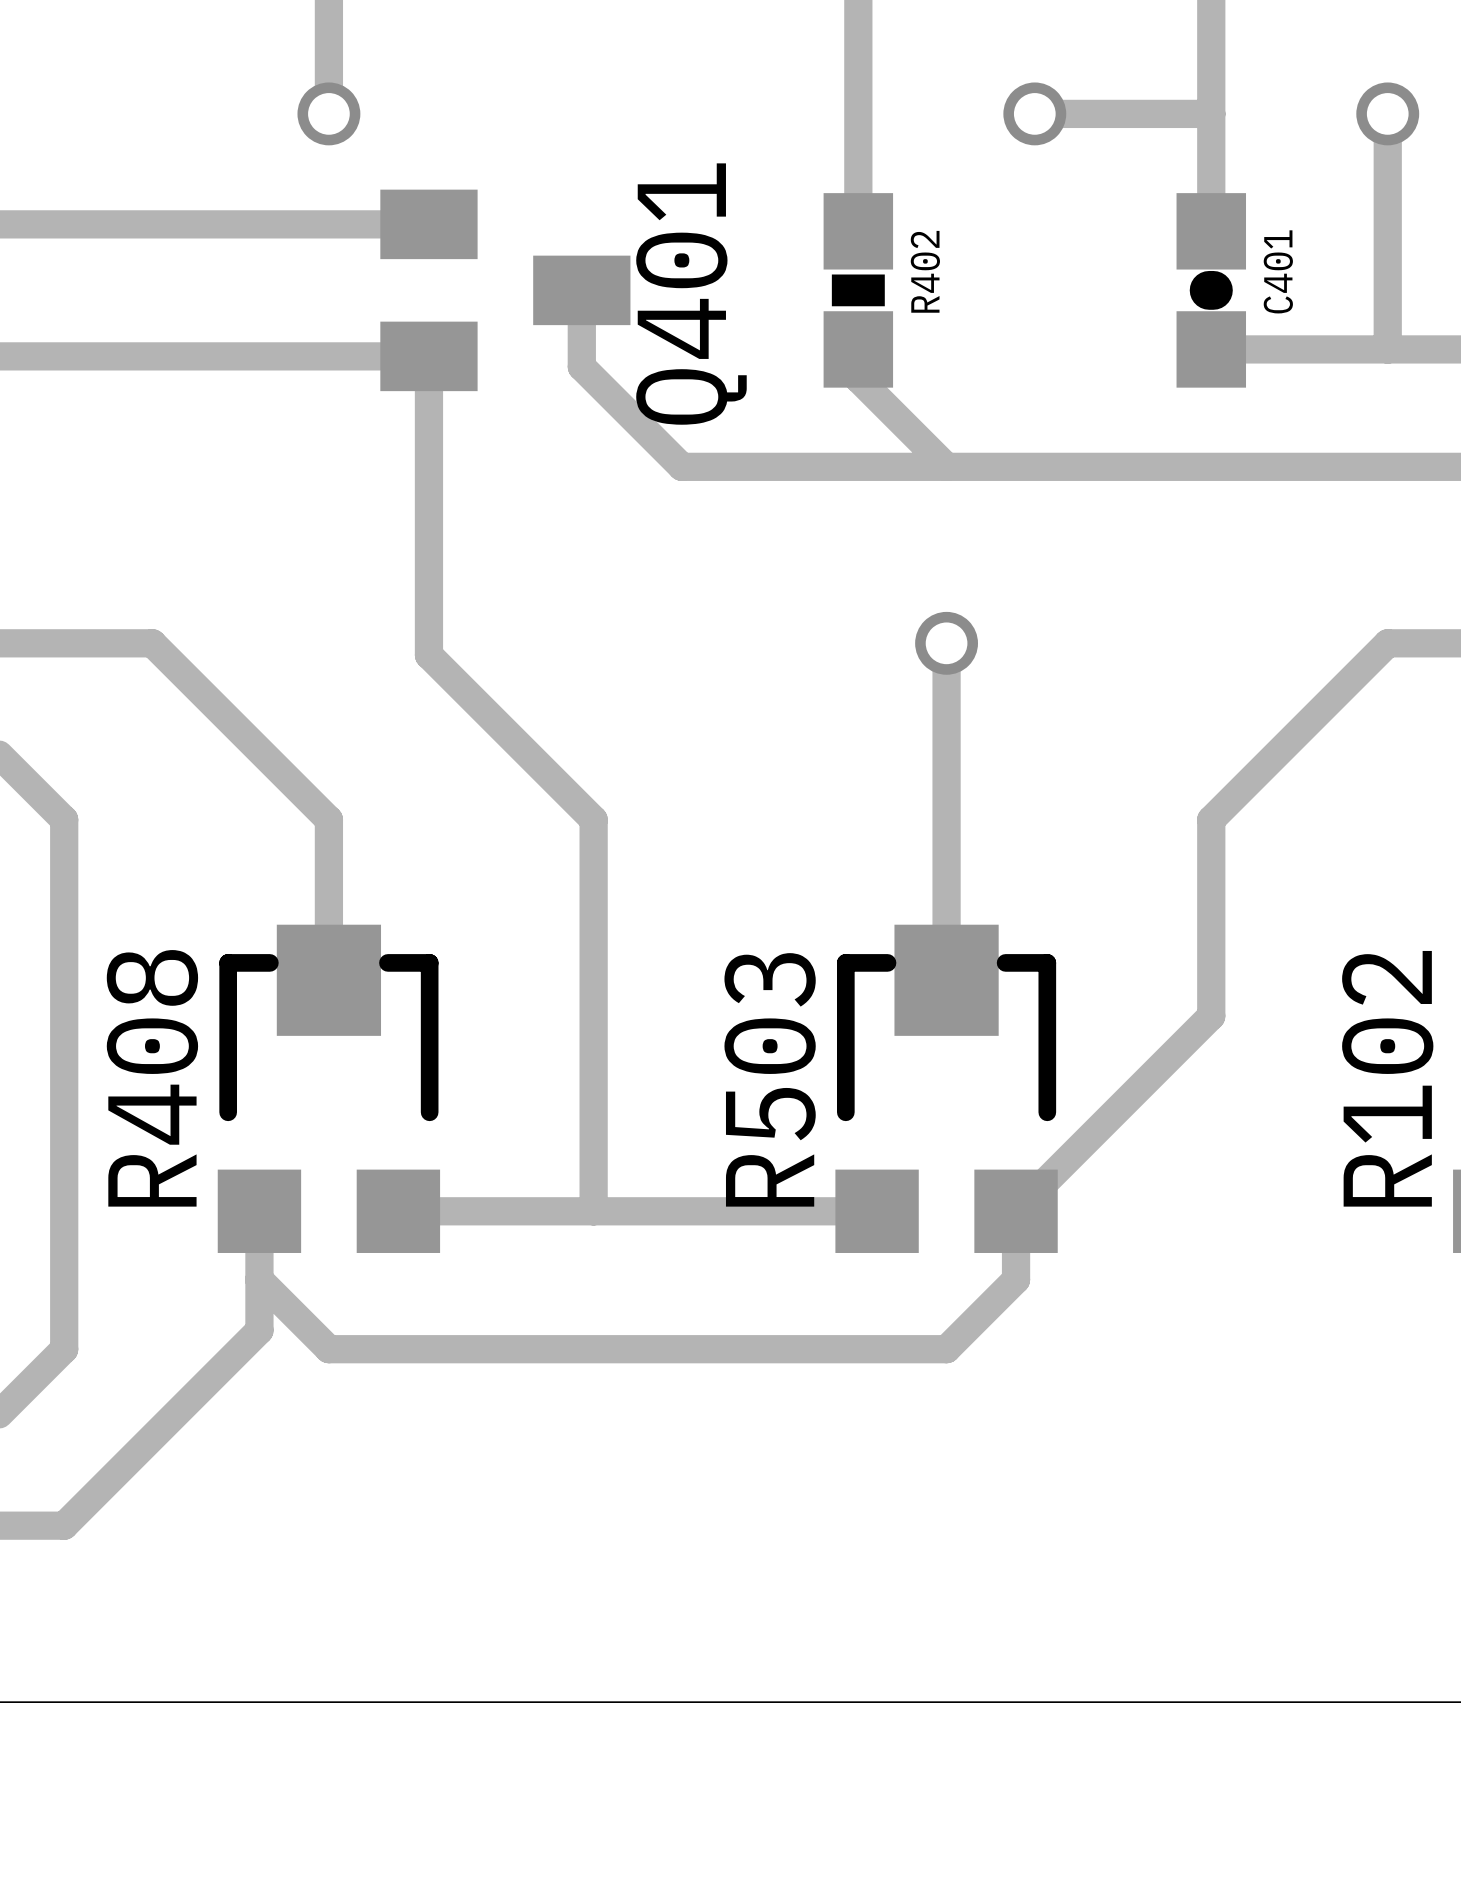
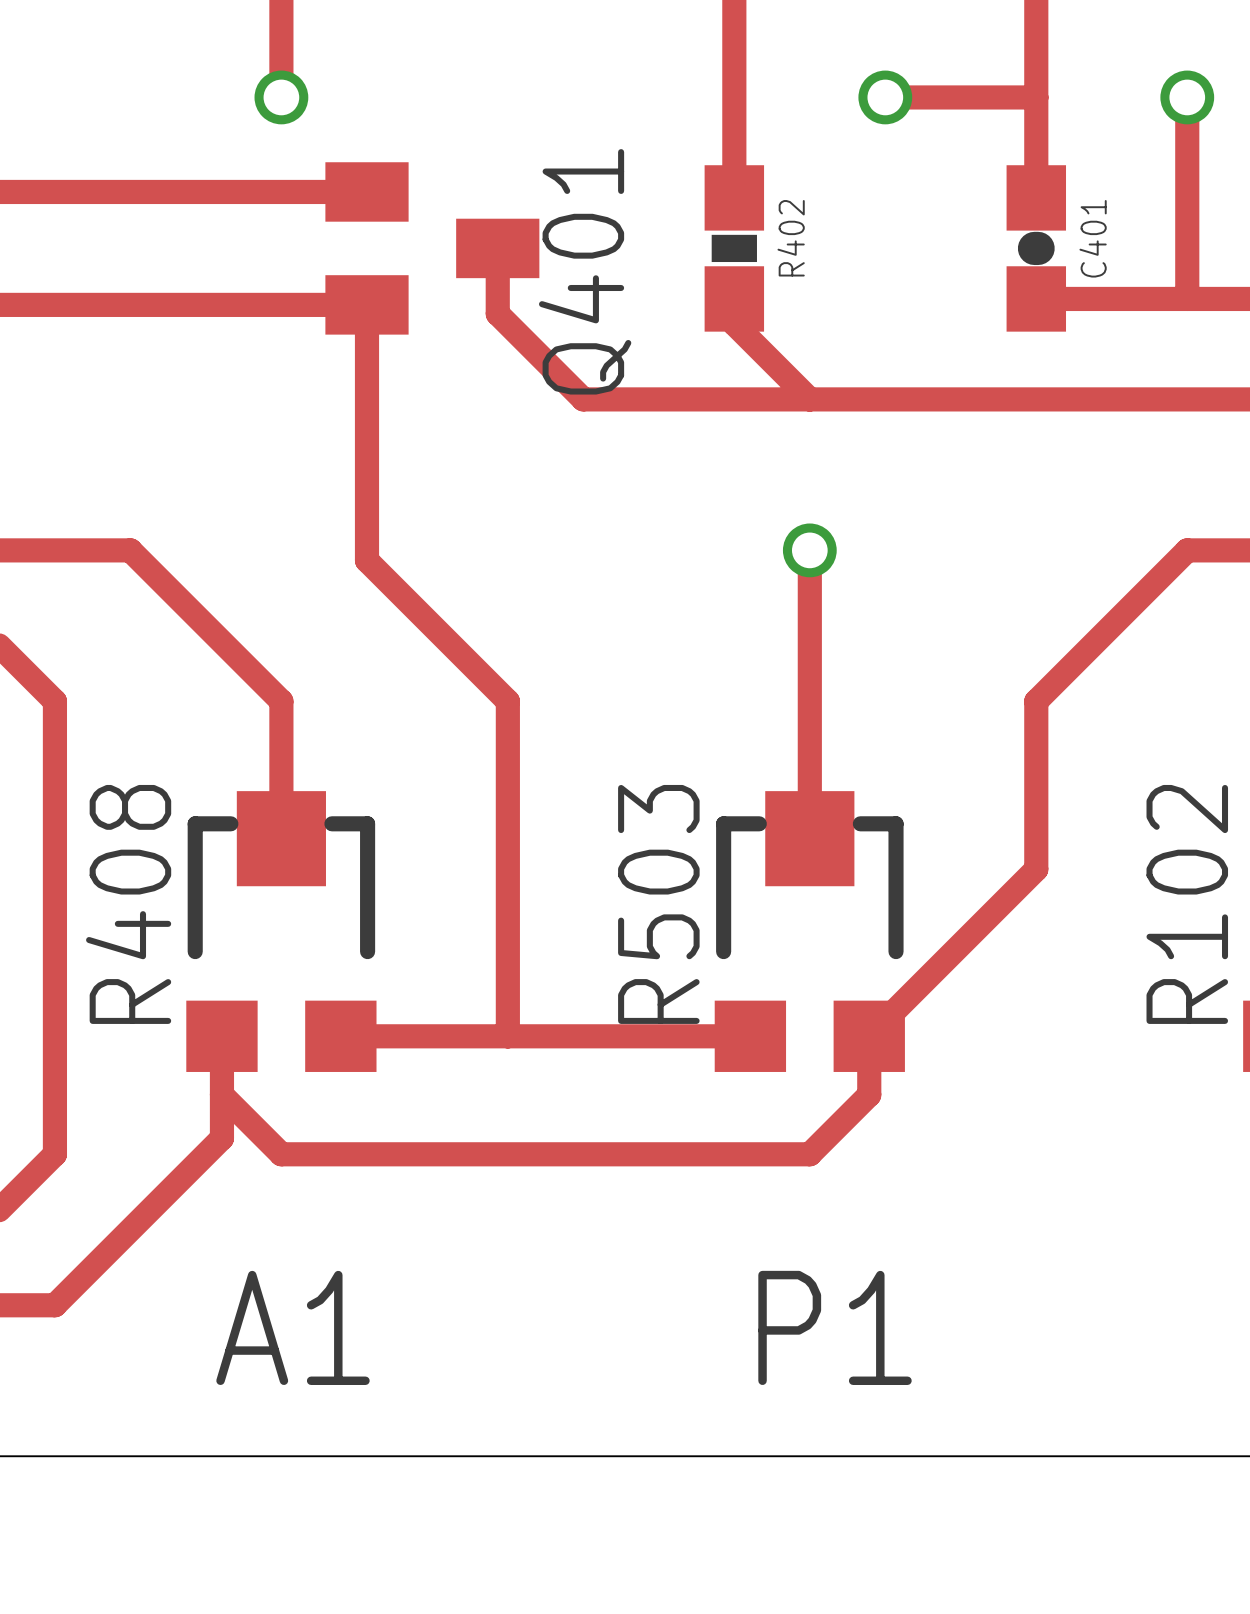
text: none -> A1 (293, 1327)
text: none -> P1 (835, 1327)

